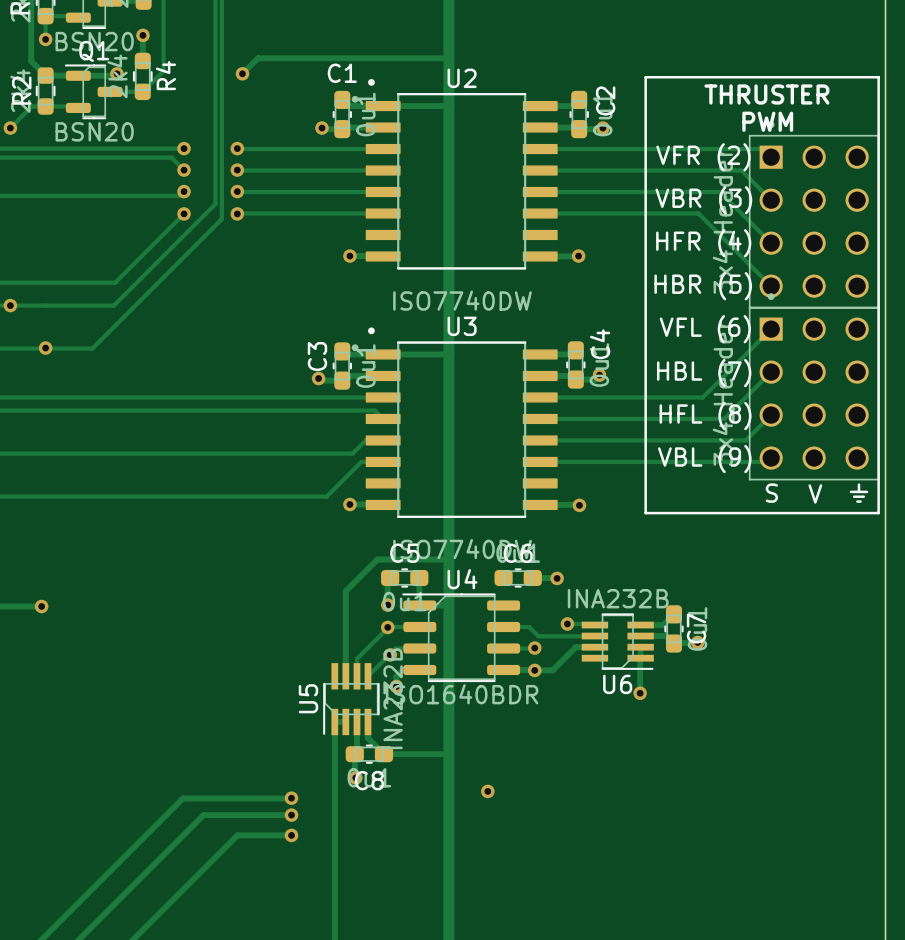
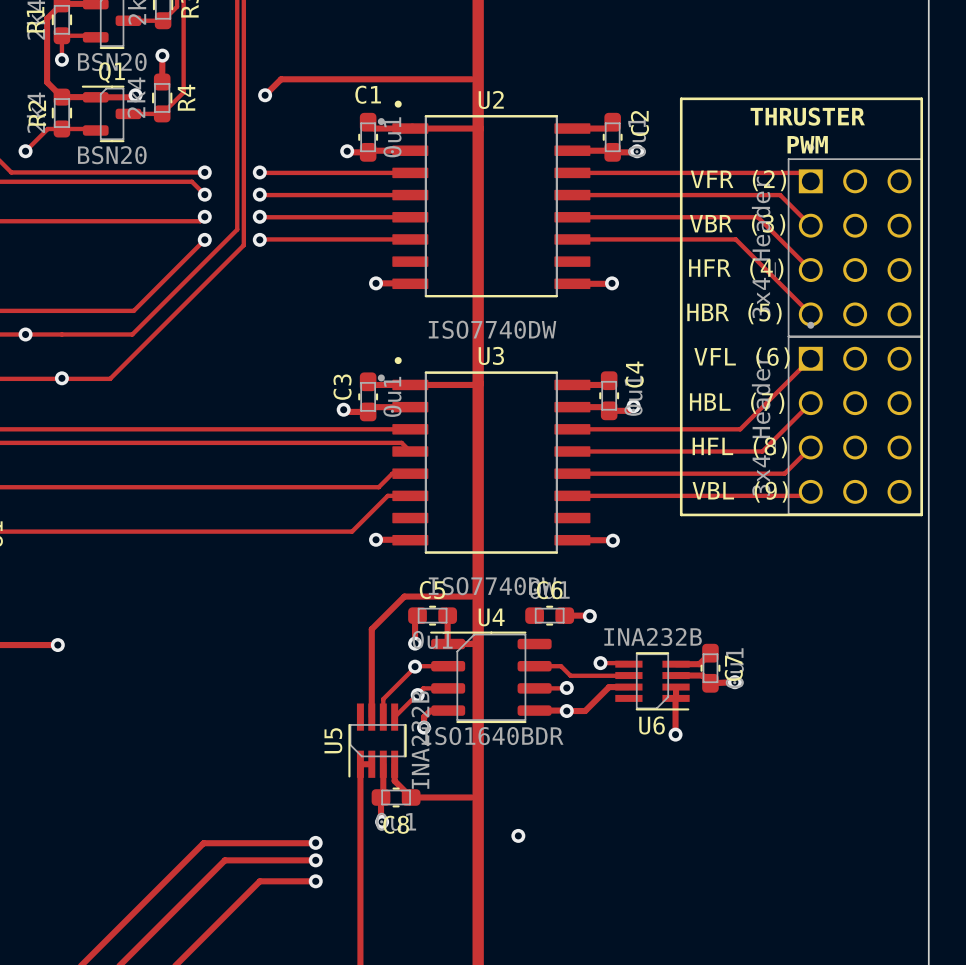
line: (645, 480) (645, 513) (878, 513) (878, 480) -> (681, 514) (921, 514)
text: S (771, 493) -> none
text: V (815, 493) -> none
text: ⏚ (858, 493) -> none

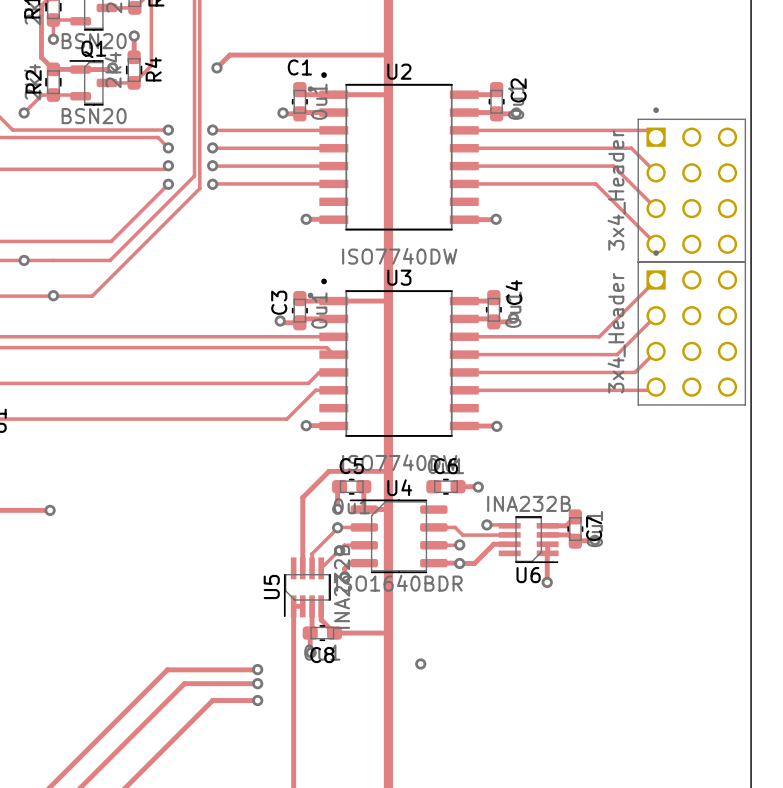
line: (681, 98) (921, 98) (921, 514) (681, 514) (681, 98) -> none
text: THRUSTER (807, 116) -> none
text: PWM (807, 144) -> none
text: VFR (2) (738, 180) -> none
text: VBR (3) (737, 224) -> none
text: HFR (4) (736, 269) -> none
text: HBR (5) (734, 313) -> none
text: VFL (6) (741, 358) -> none
text: HBL (7) (737, 403) -> none
text: HFL (8) (739, 447) -> none
text: VBL (9) (740, 491) -> none

